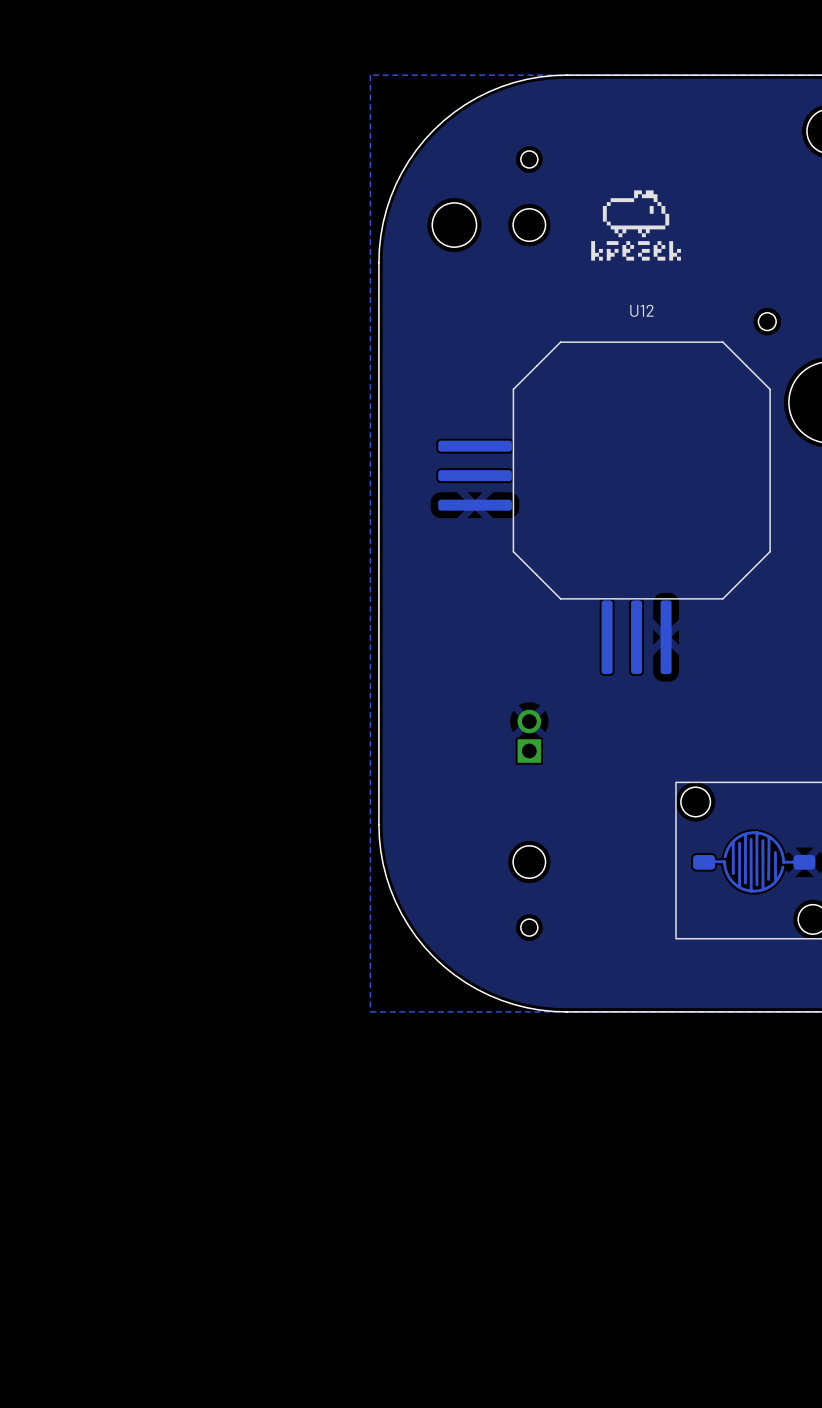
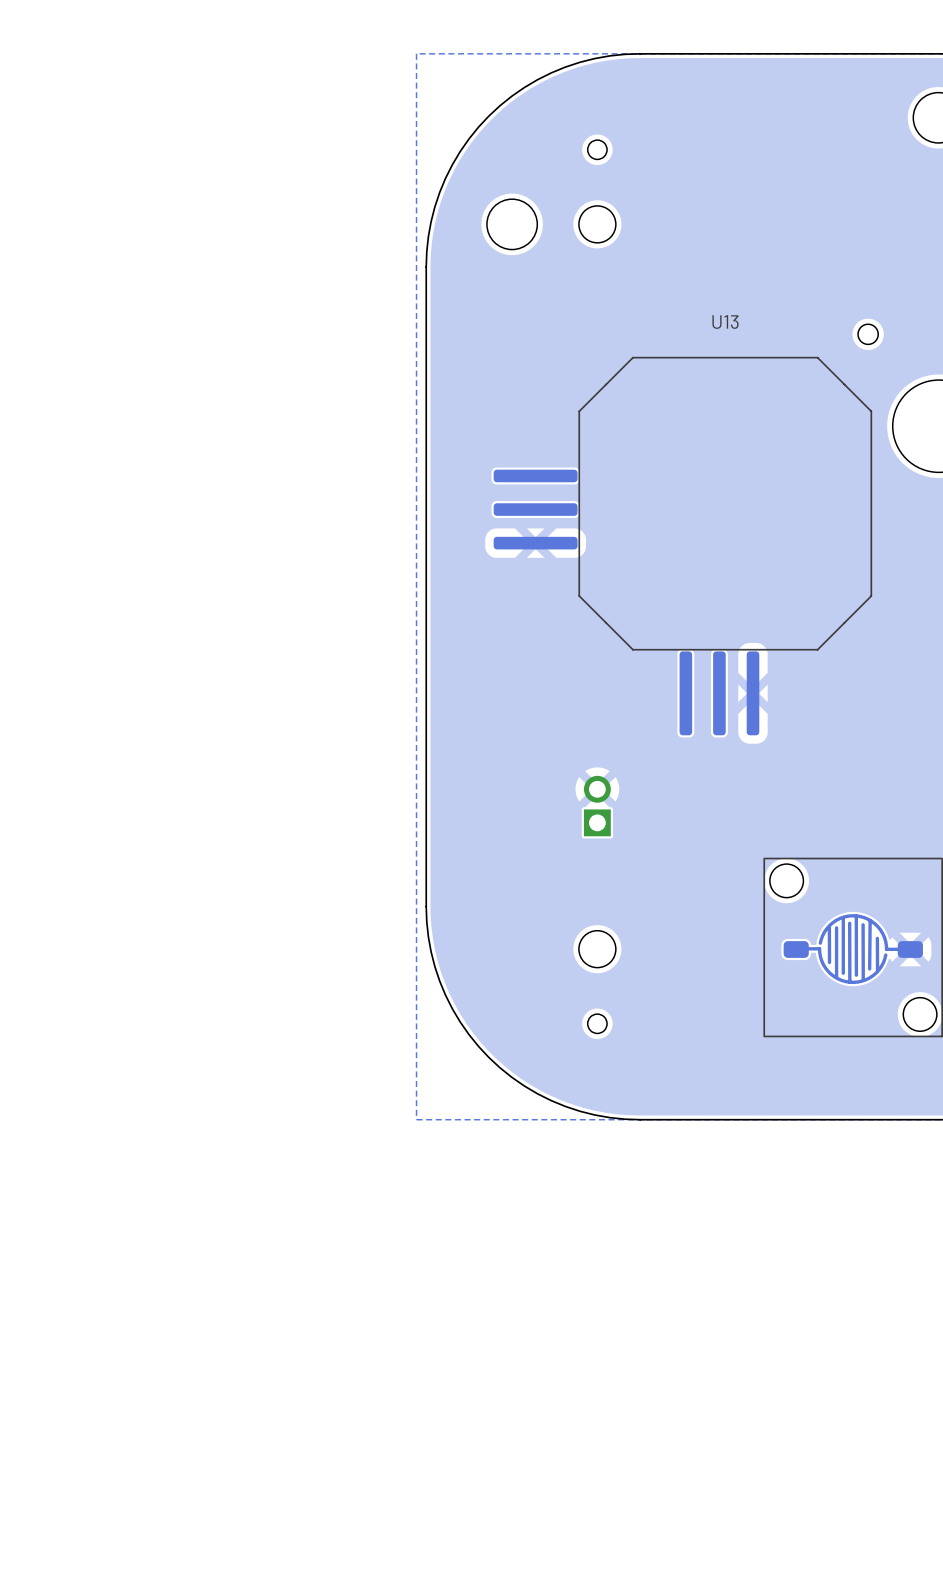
drawing: [591, 190, 681, 261] -> none
U12 name: U12 (641, 310) -> U13 (725, 322)

